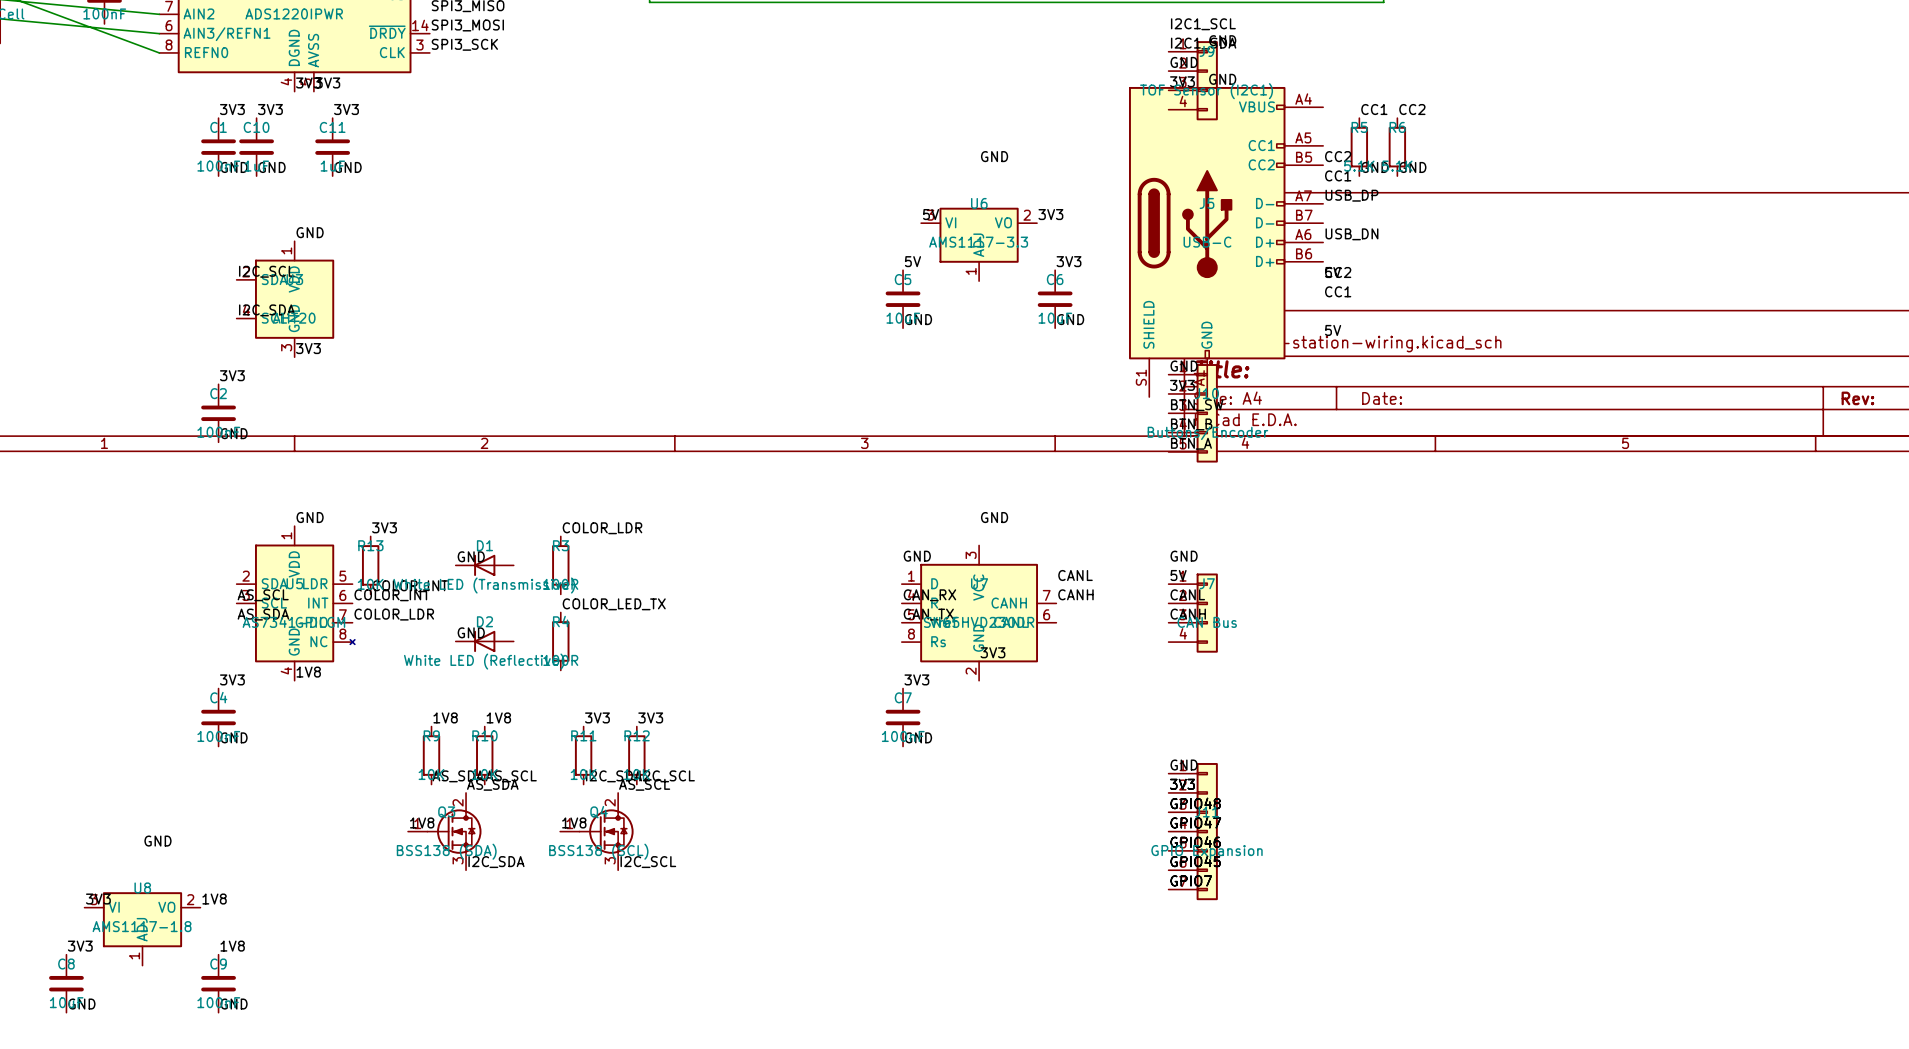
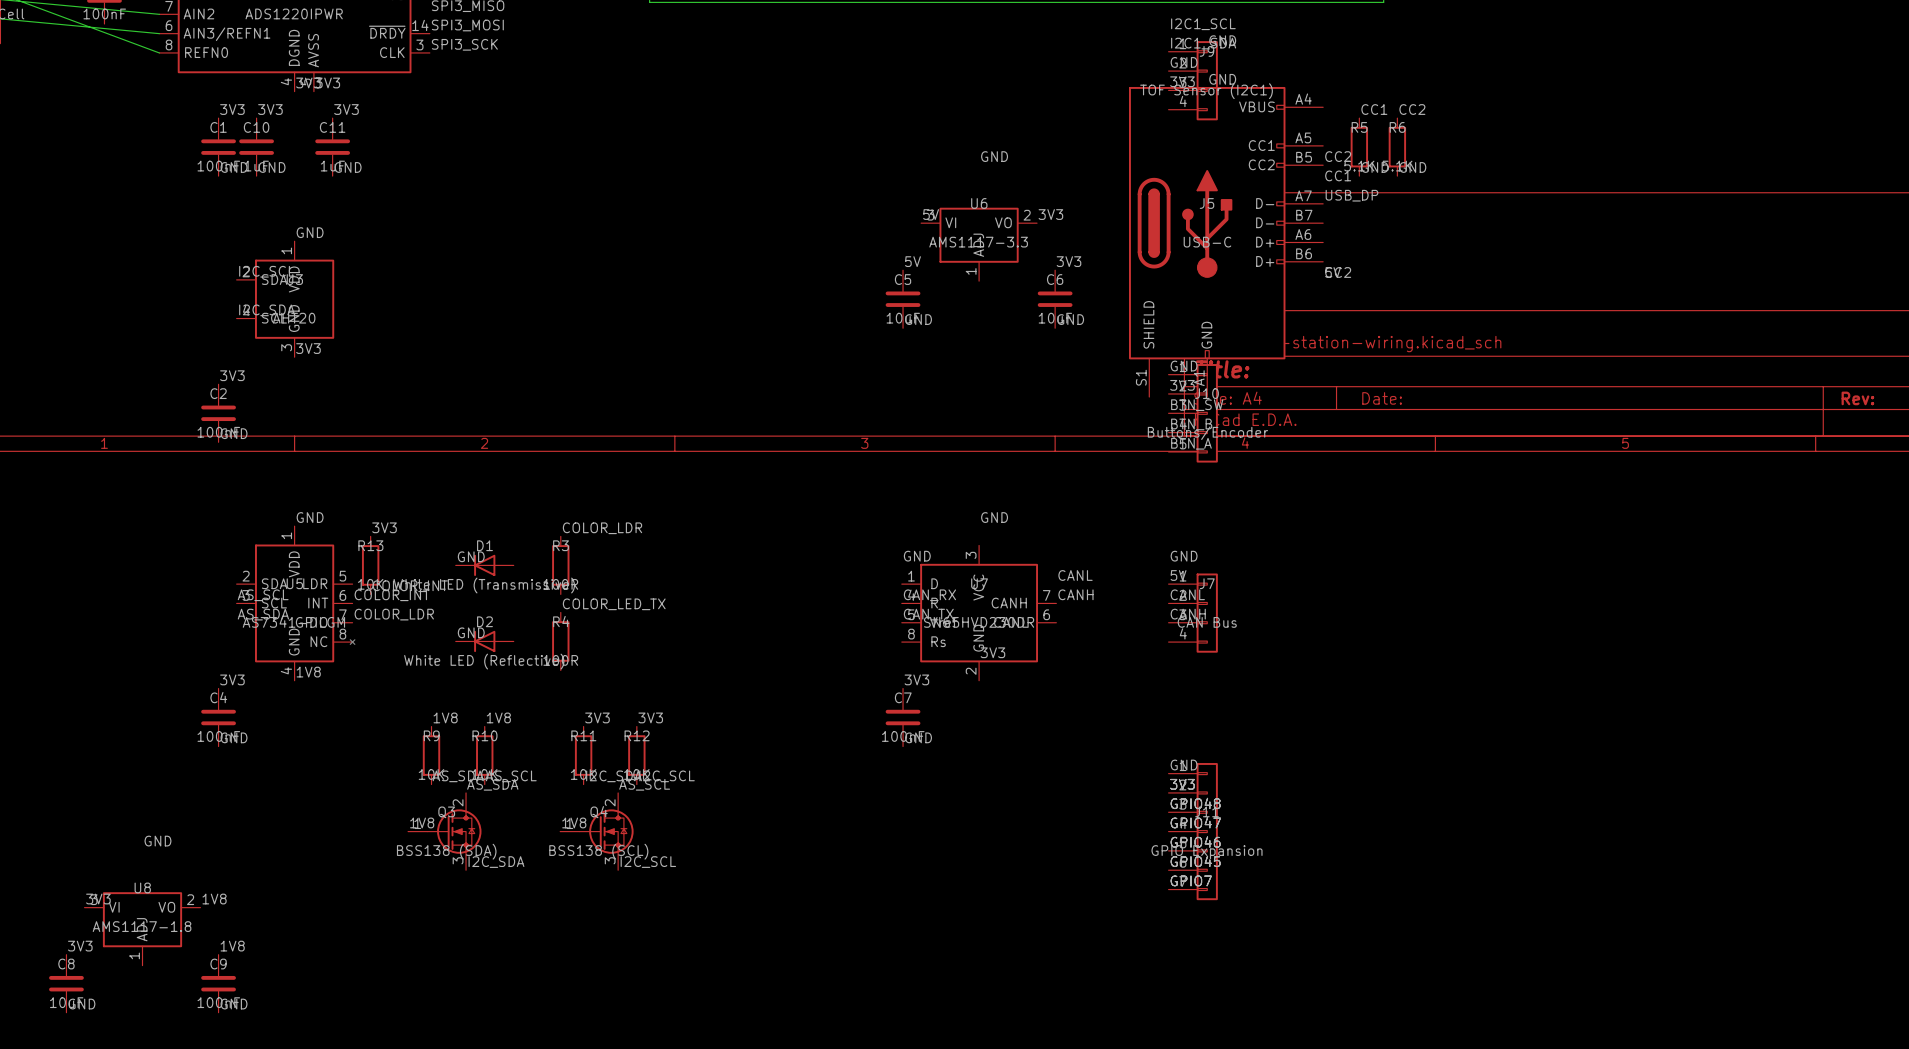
label: USB_DN (1351, 234) -> none
label: CC1 (1338, 291) -> none
label: 5V (1333, 330) -> none

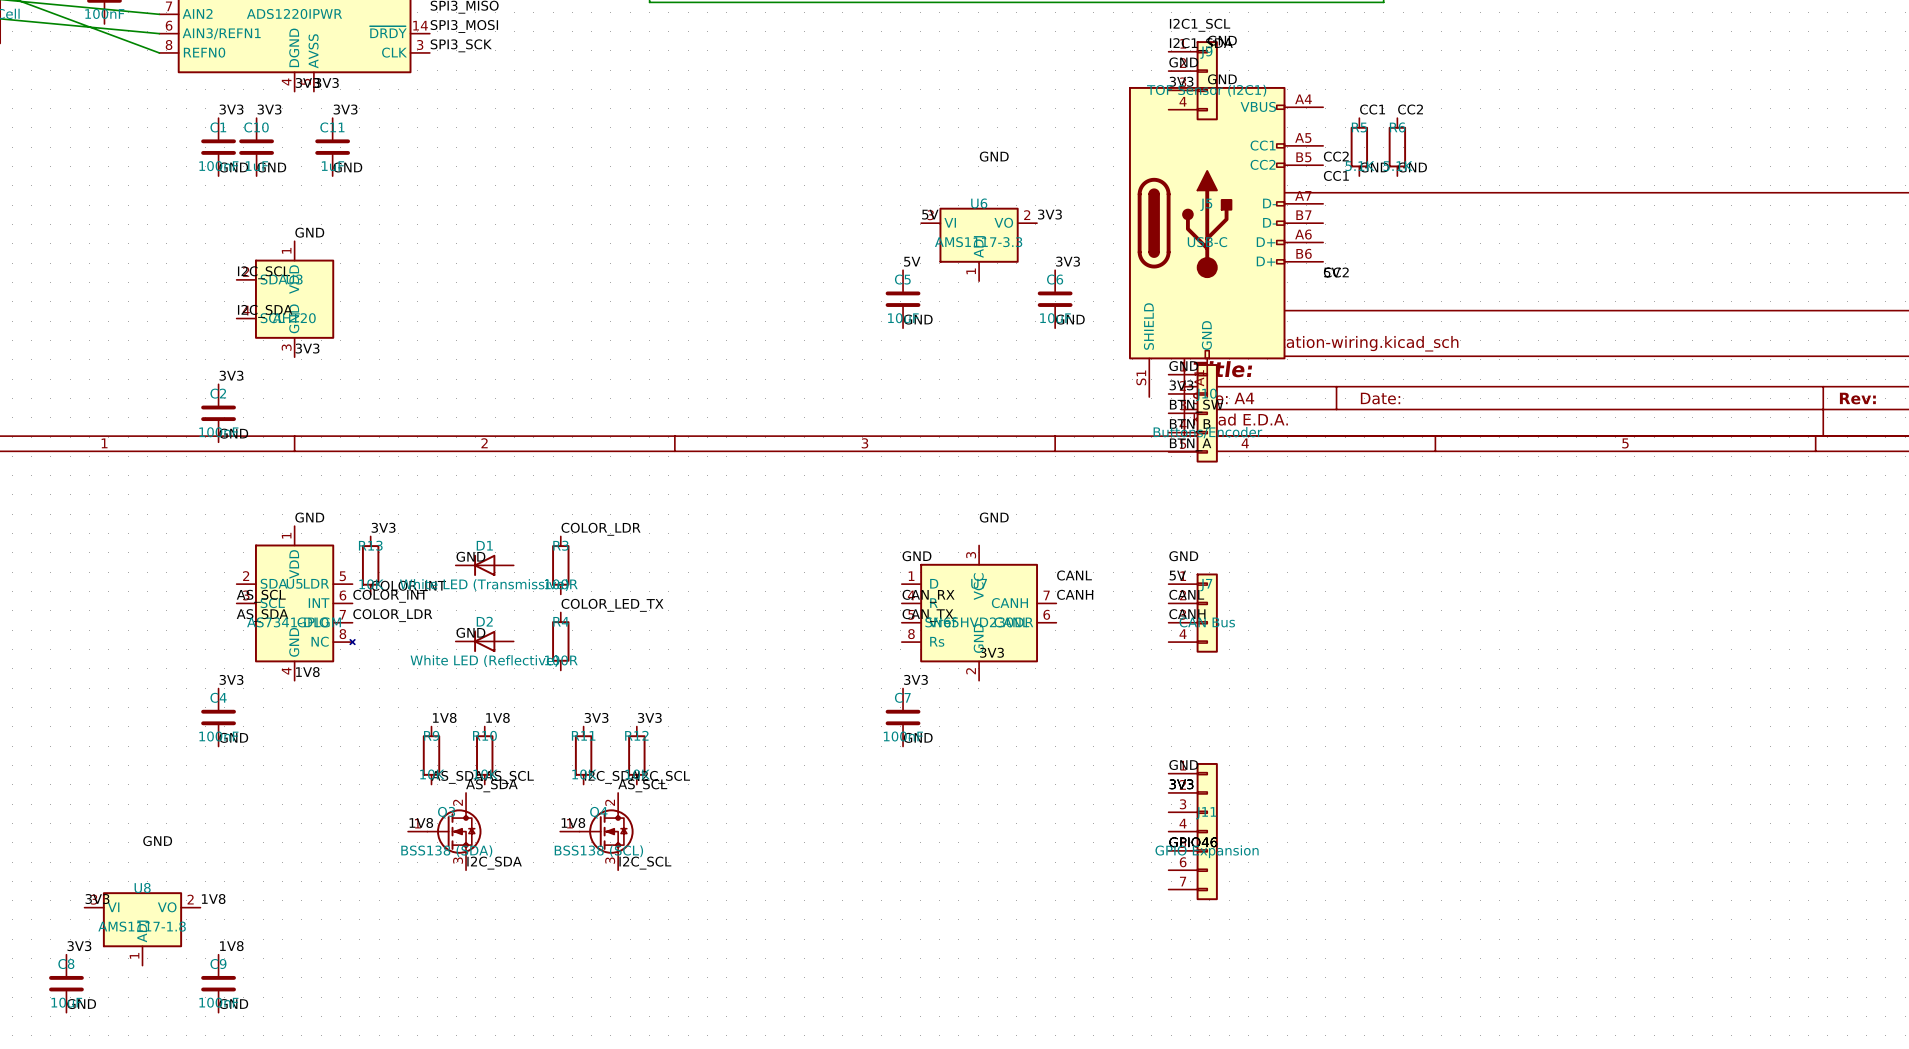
label: USB_DP (1351, 195) -> none
label: GPIO48 (1195, 803) -> none
label: GPIO47 (1195, 822) -> none
label: GPIO45 (1195, 861) -> none
label: GPIO7 (1191, 880) -> none

